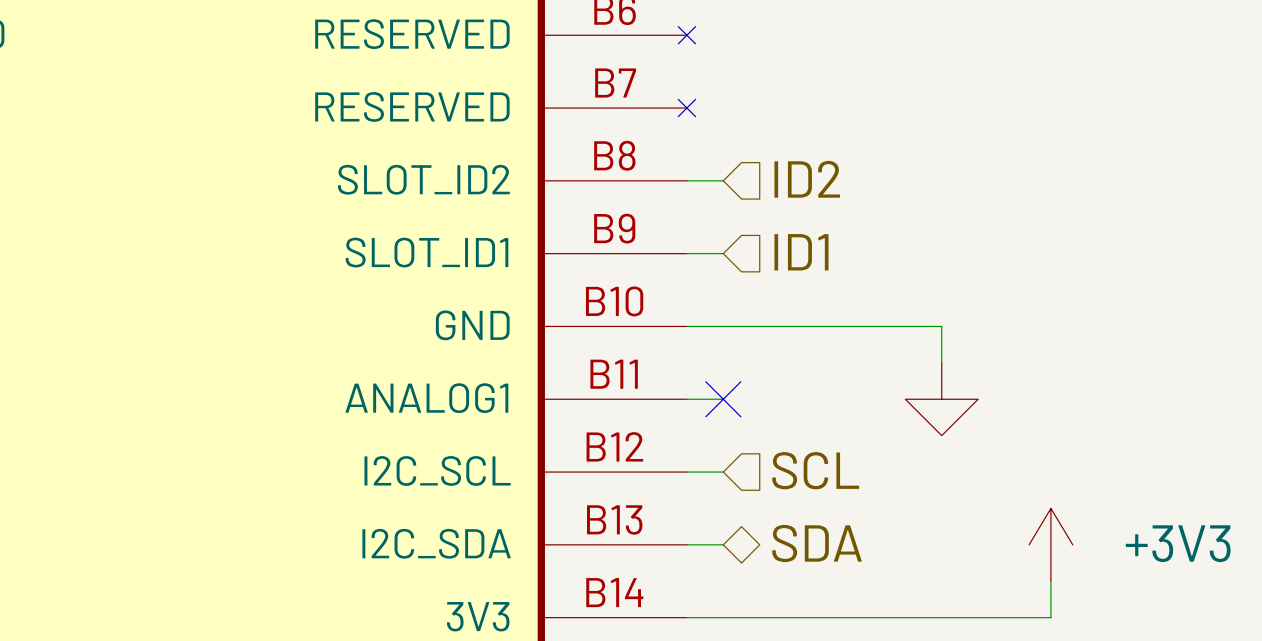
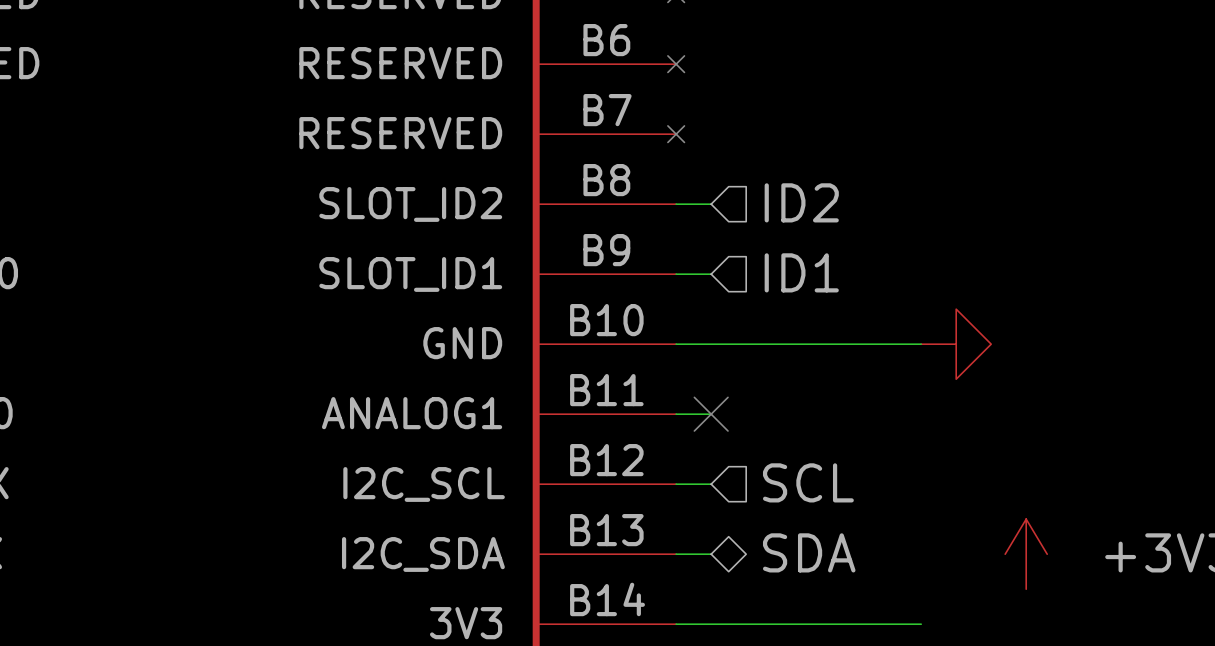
wire: (941, 326) (941, 362) -> none
power symbol rotation: 0° (941, 399) -> 90° counterclockwise (956, 344)
power symbol position: (941, 399) -> (956, 344)
wire: (1050, 581) (1050, 617) (941, 617) -> none

